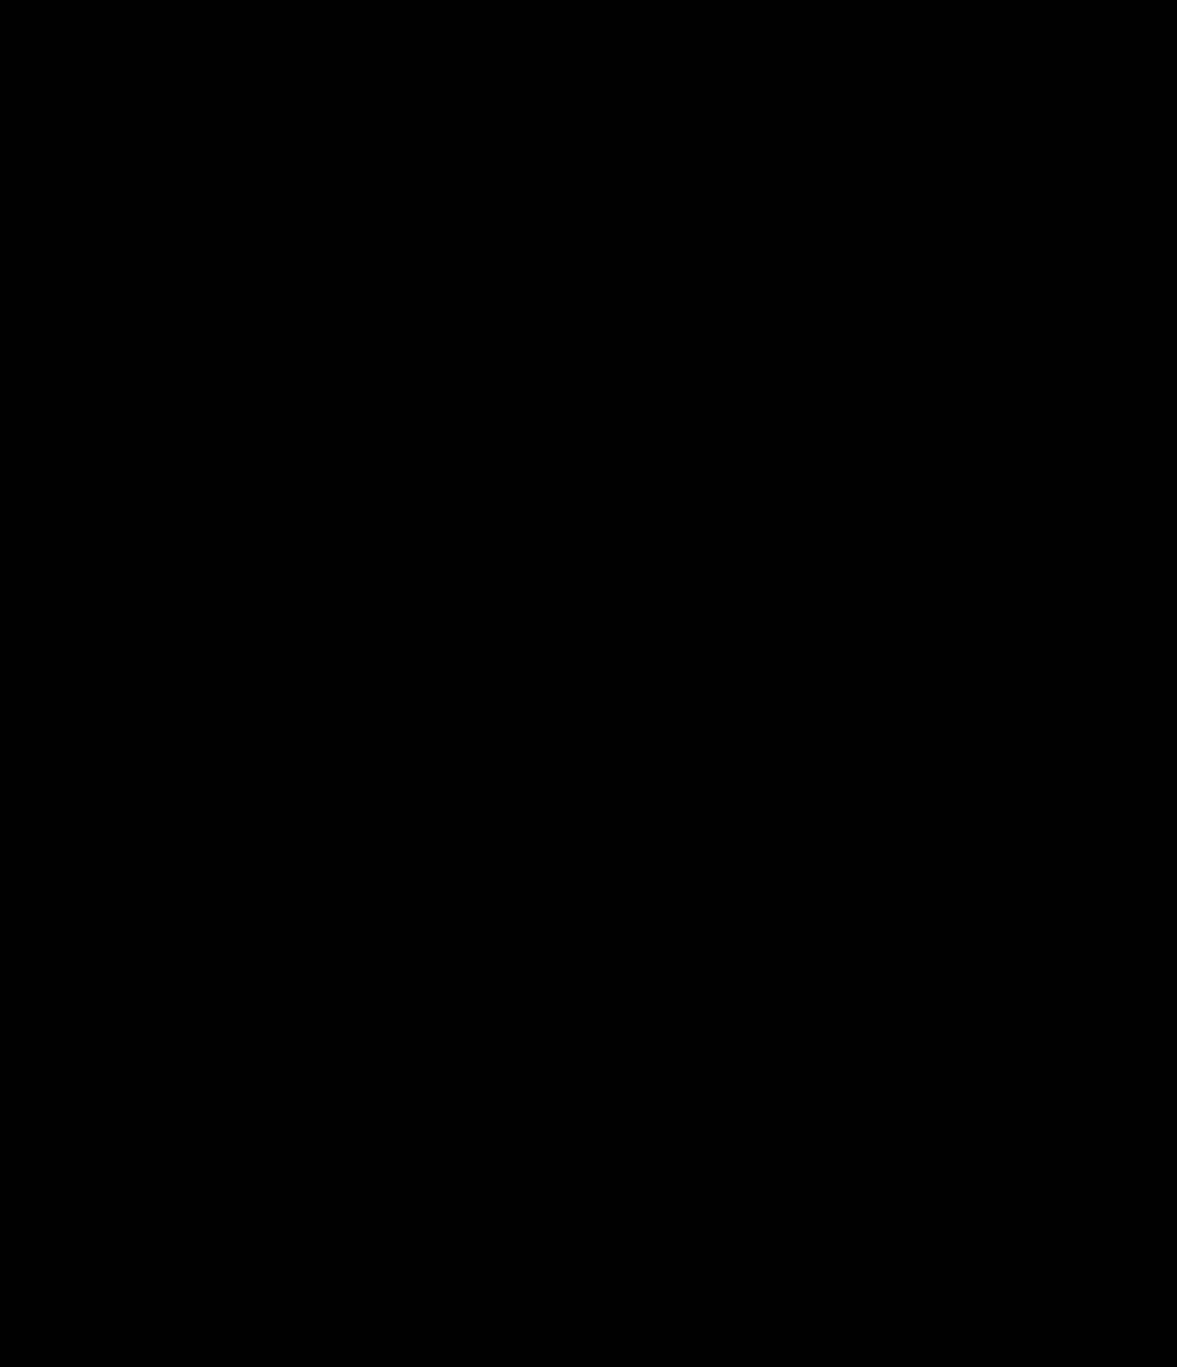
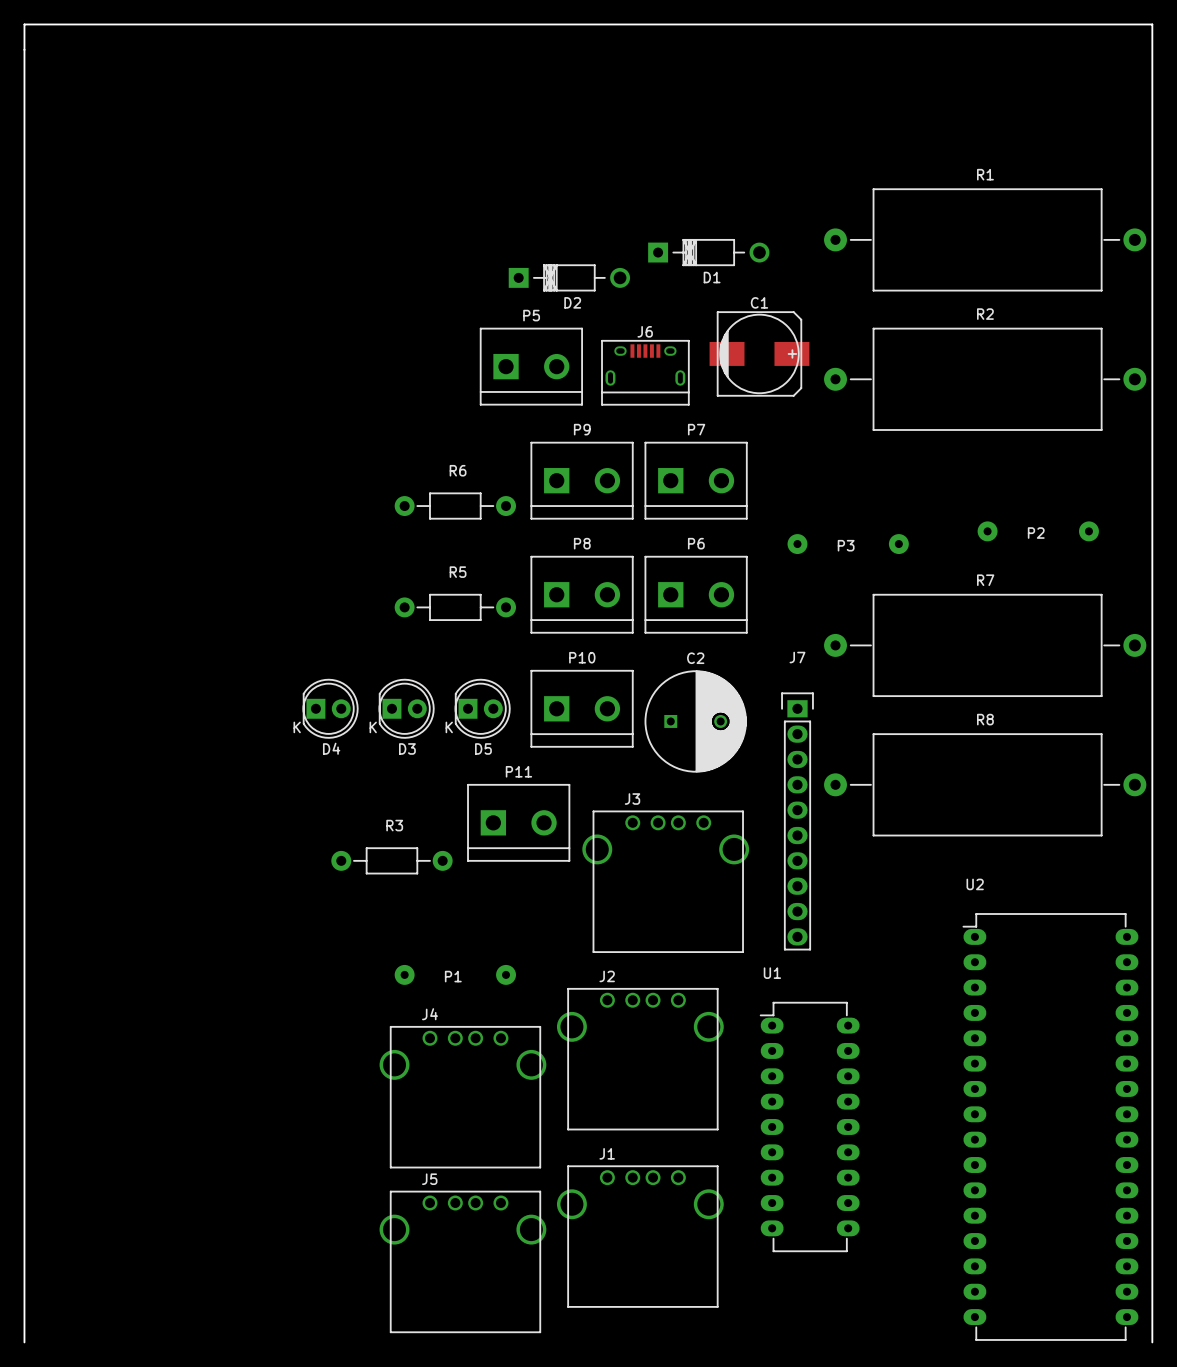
R1: none -> (985, 239)
D1: none -> (708, 252)
D2: none -> (569, 277)
C1: none -> (759, 353)
P5: none -> (531, 366)
J6: none -> (645, 372)
R2: none -> (985, 379)
P9: none -> (582, 480)
P7: none -> (696, 480)
R6: none -> (455, 506)
P2: none -> (1038, 531)
P3: none -> (848, 544)
P8: none -> (582, 594)
P6: none -> (696, 594)
R5: none -> (455, 607)
R7: none -> (985, 645)
D4: none -> (330, 708)
D3: none -> (406, 708)
D5: none -> (482, 708)
P10: none -> (582, 708)
C2: none -> (695, 721)
R8: none -> (985, 784)
J7: none -> (797, 821)
P11: none -> (518, 822)
R3: none -> (391, 860)
J3: none -> (665, 881)
P1: none -> (455, 974)
J2: none -> (640, 1059)
J4: none -> (462, 1097)
U1: none -> (809, 1126)
U2: none -> (1050, 1126)
J1: none -> (640, 1236)
J5: none -> (462, 1261)
board edge: none -> (24, 1342) (24, 24) (1152, 24) (1152, 1342)

